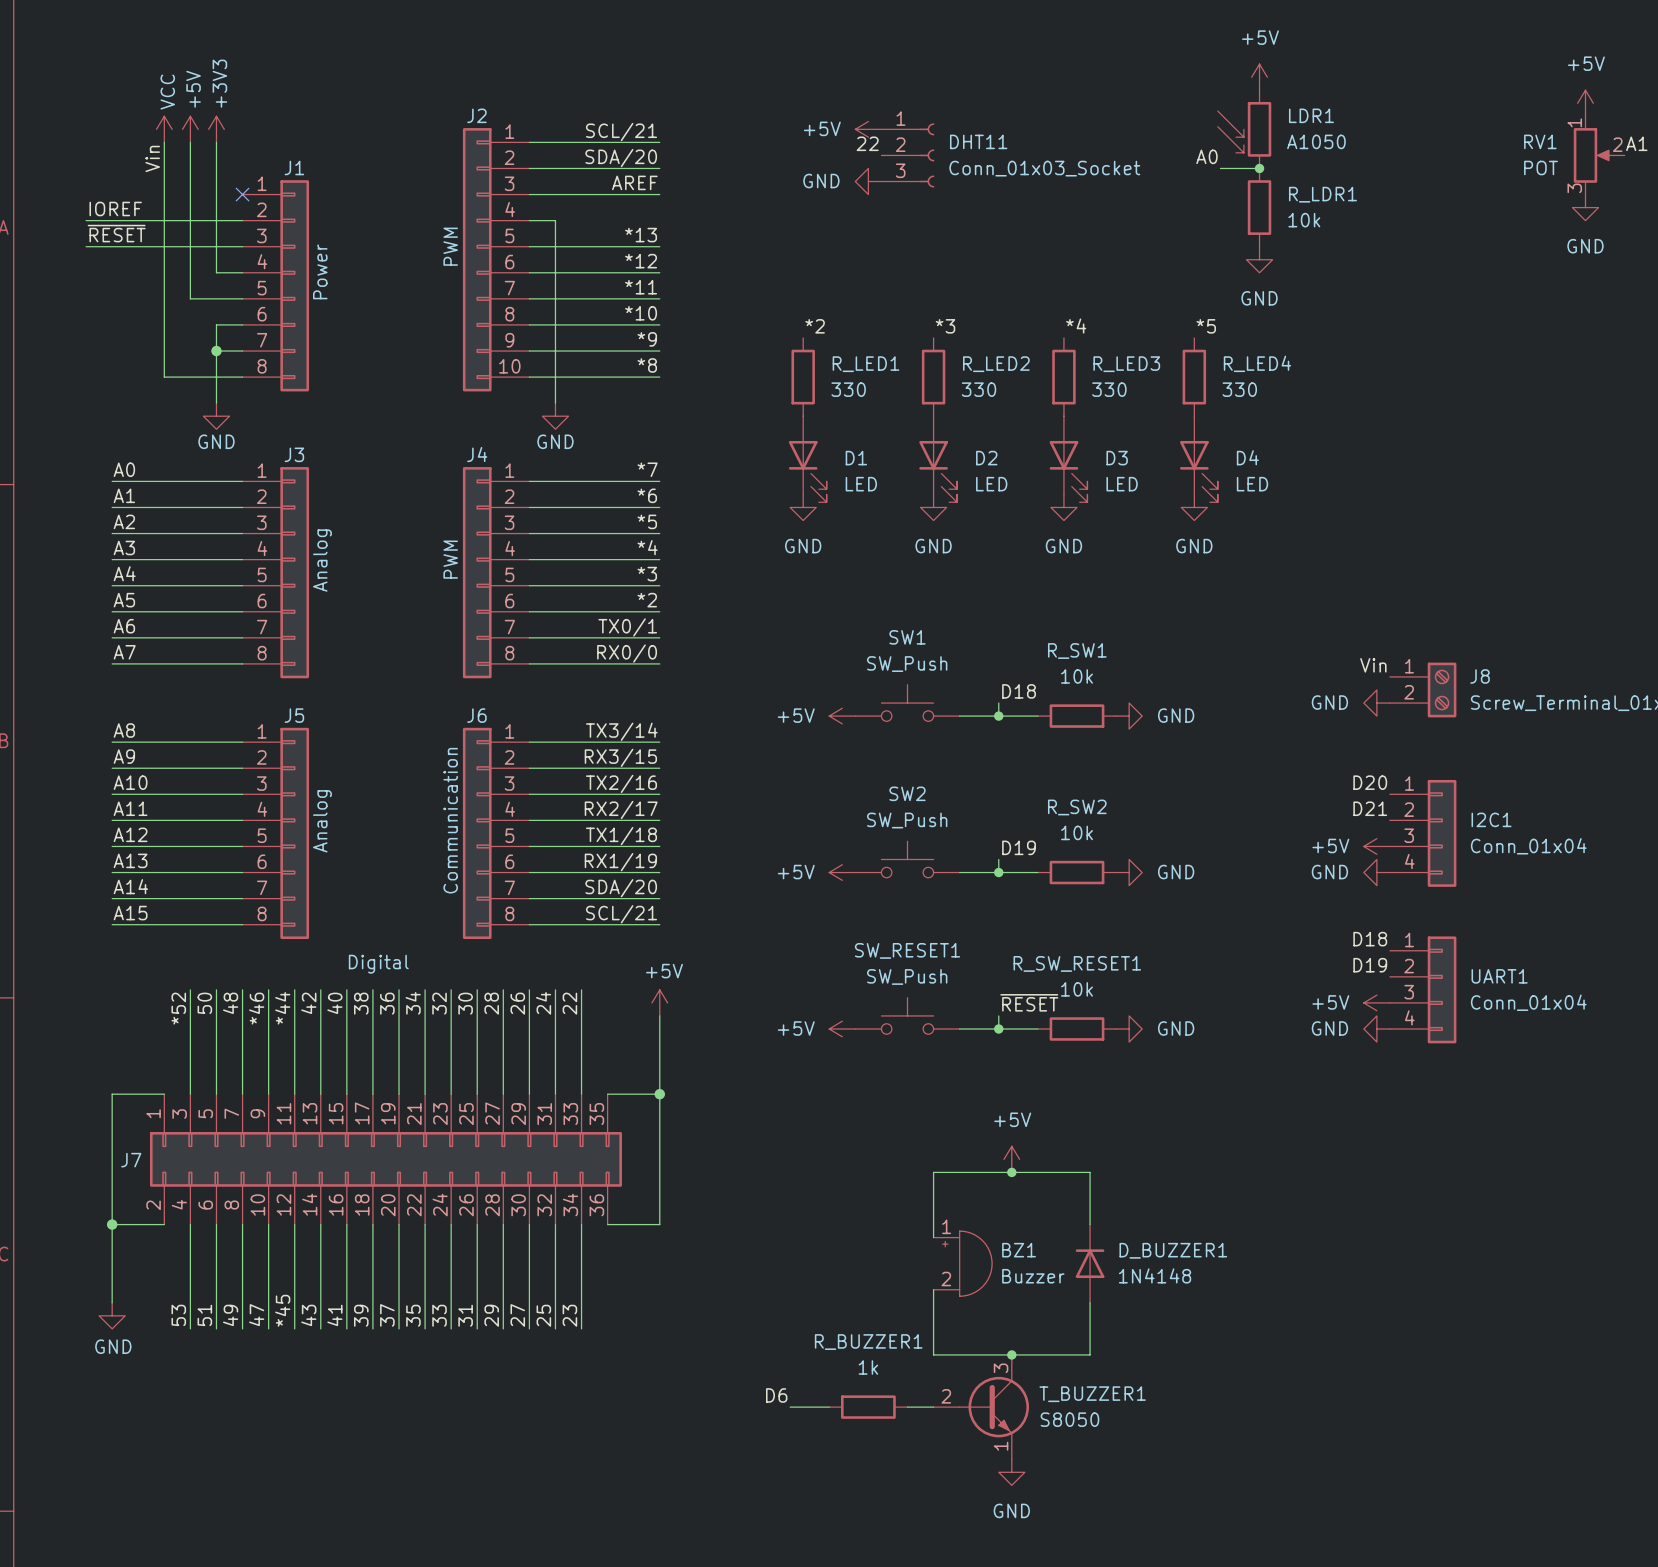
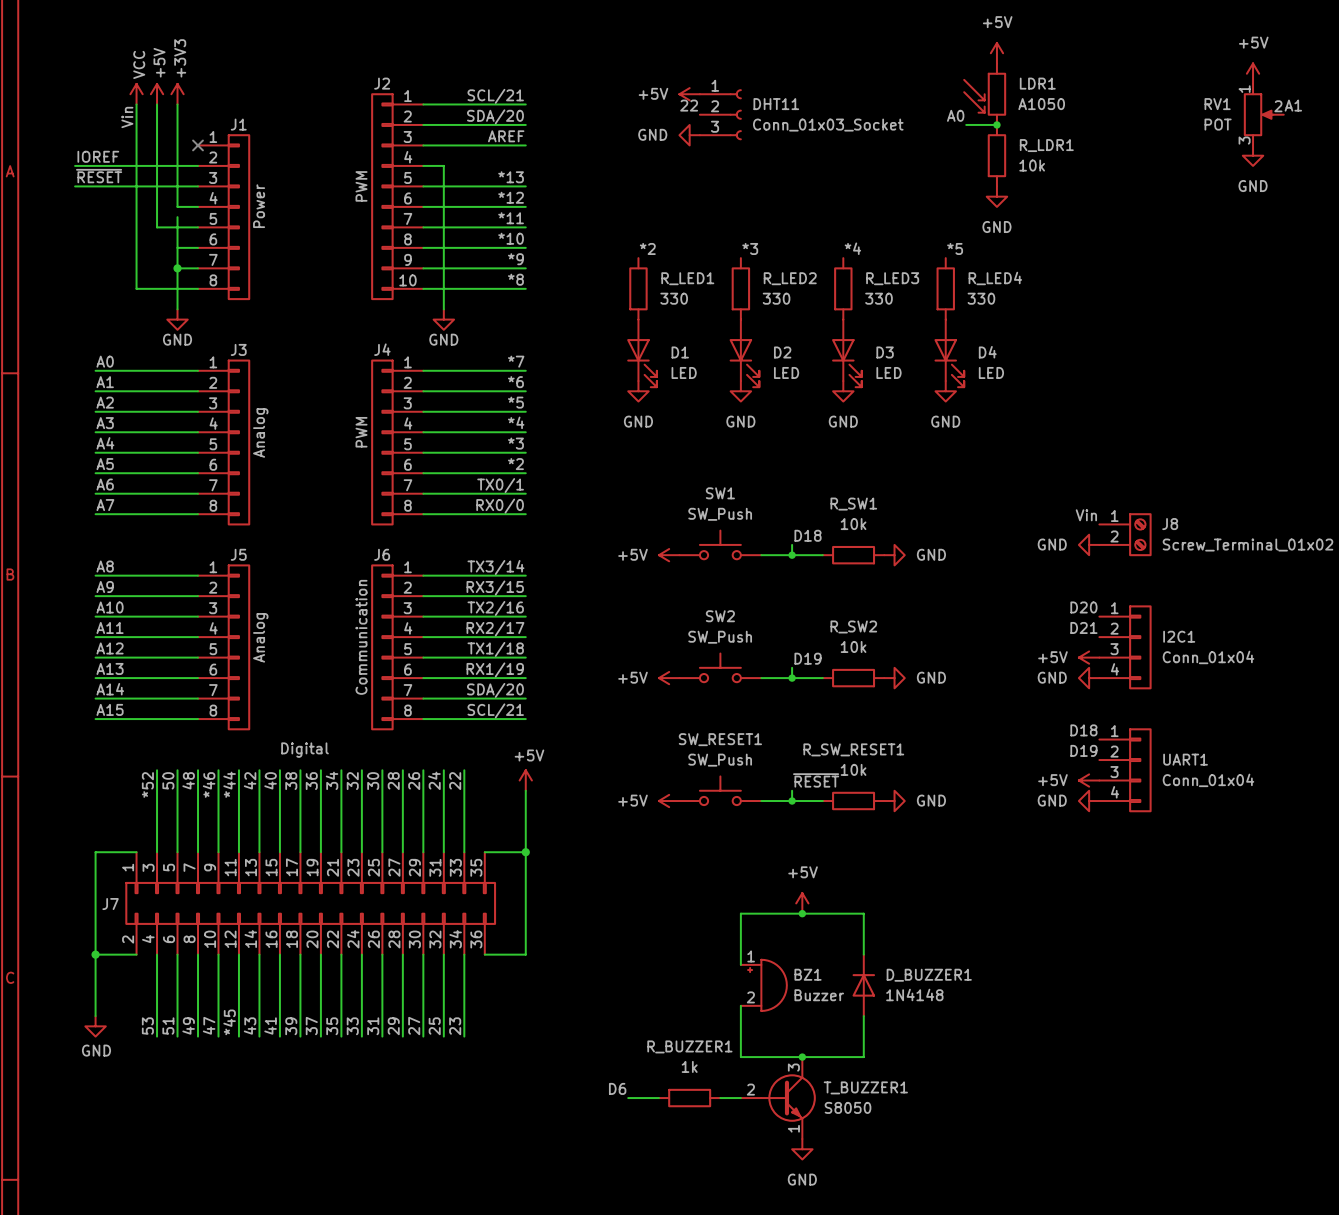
wire: none -> (177, 217) (177, 247)

